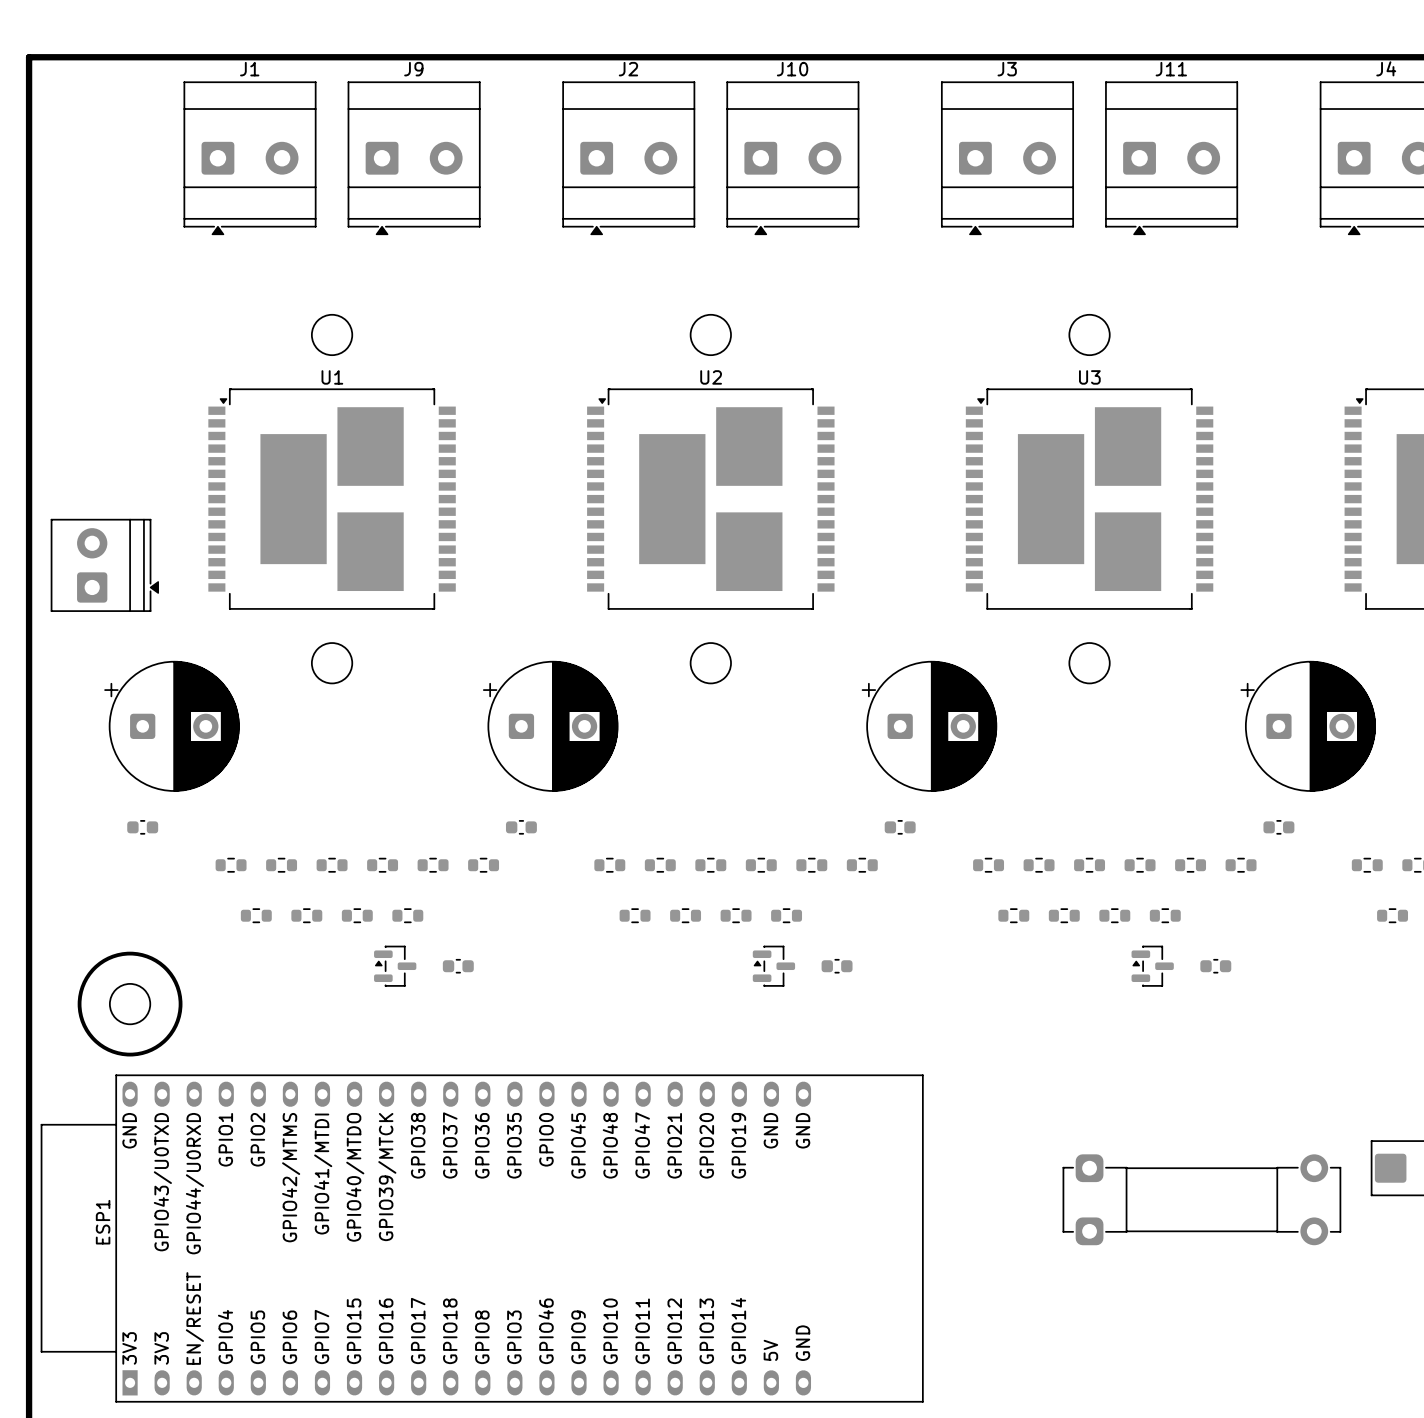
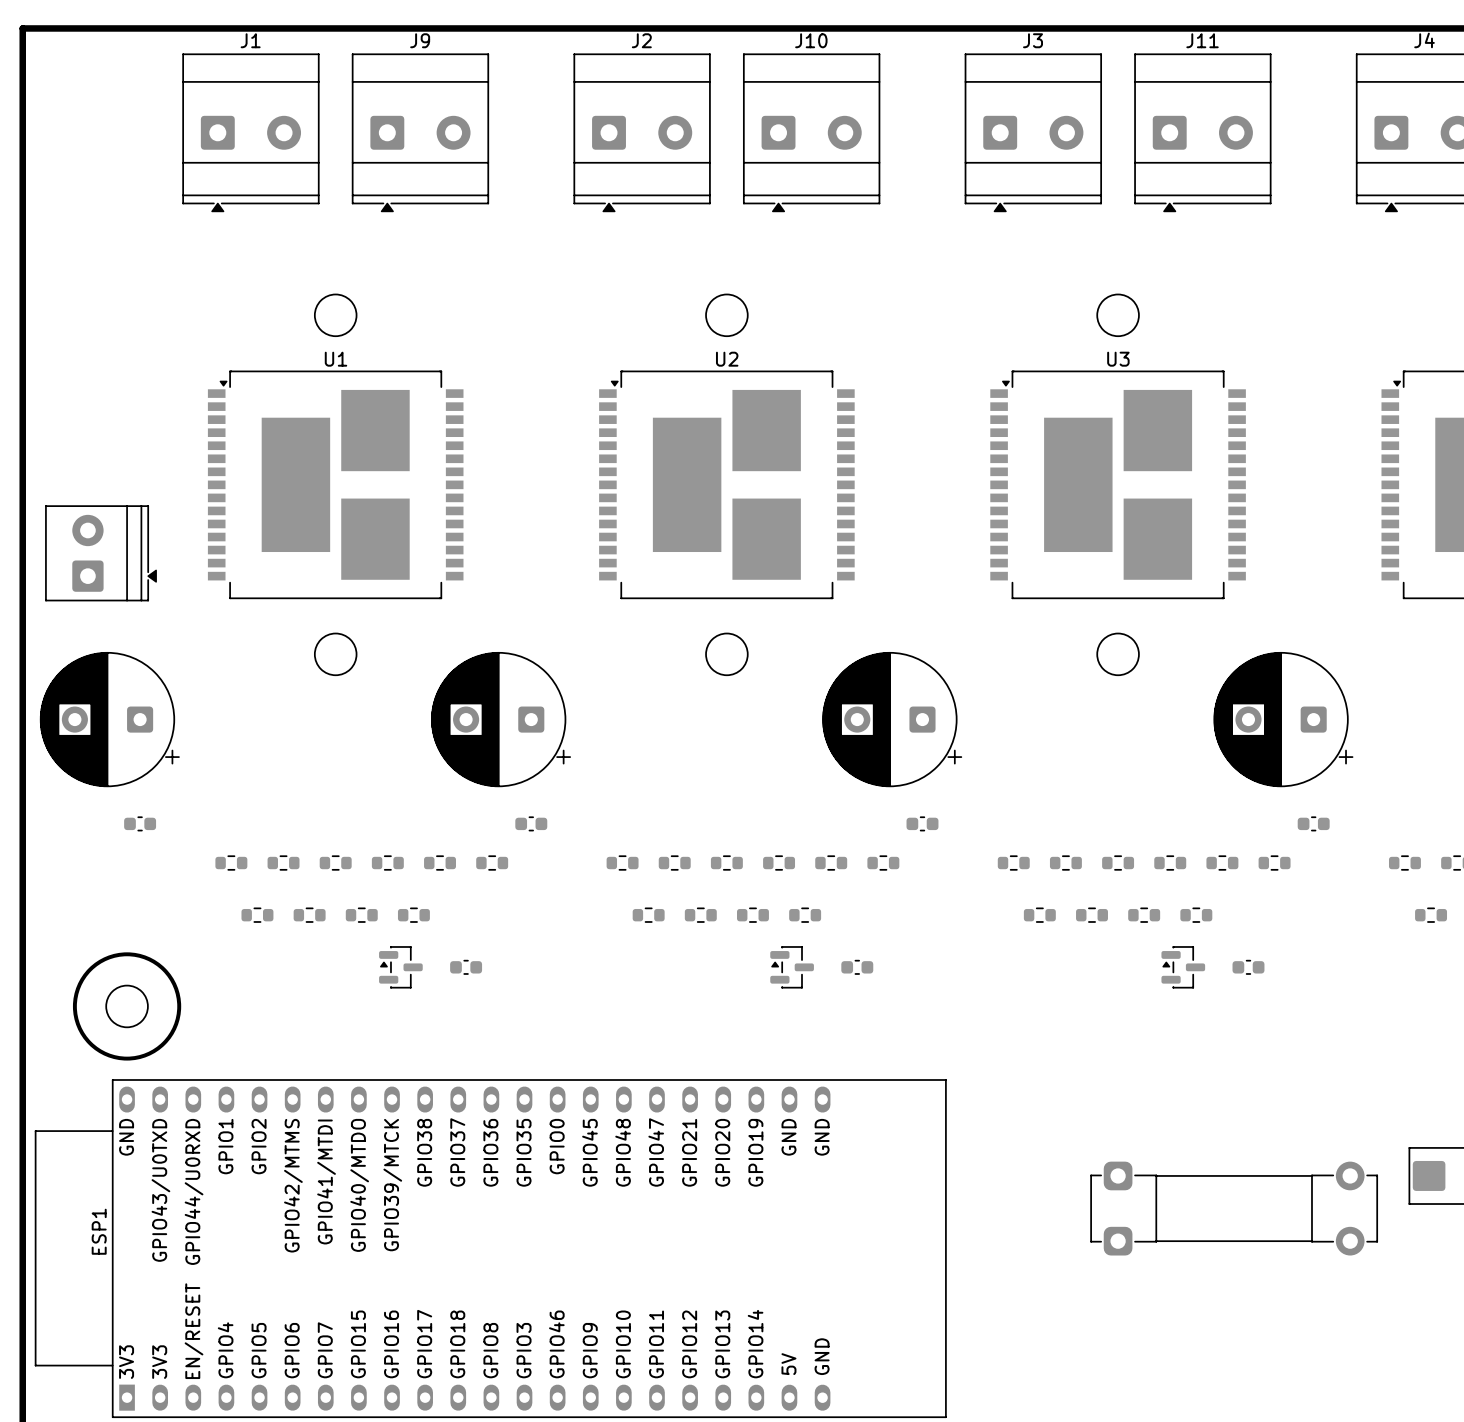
part rotation: 0° (171, 726) -> 180° (109, 719)
part rotation: 0° (550, 726) -> 180° (501, 719)
part rotation: 0° (929, 726) -> 180° (892, 719)
part rotation: 0° (1308, 726) -> 180° (1283, 719)

